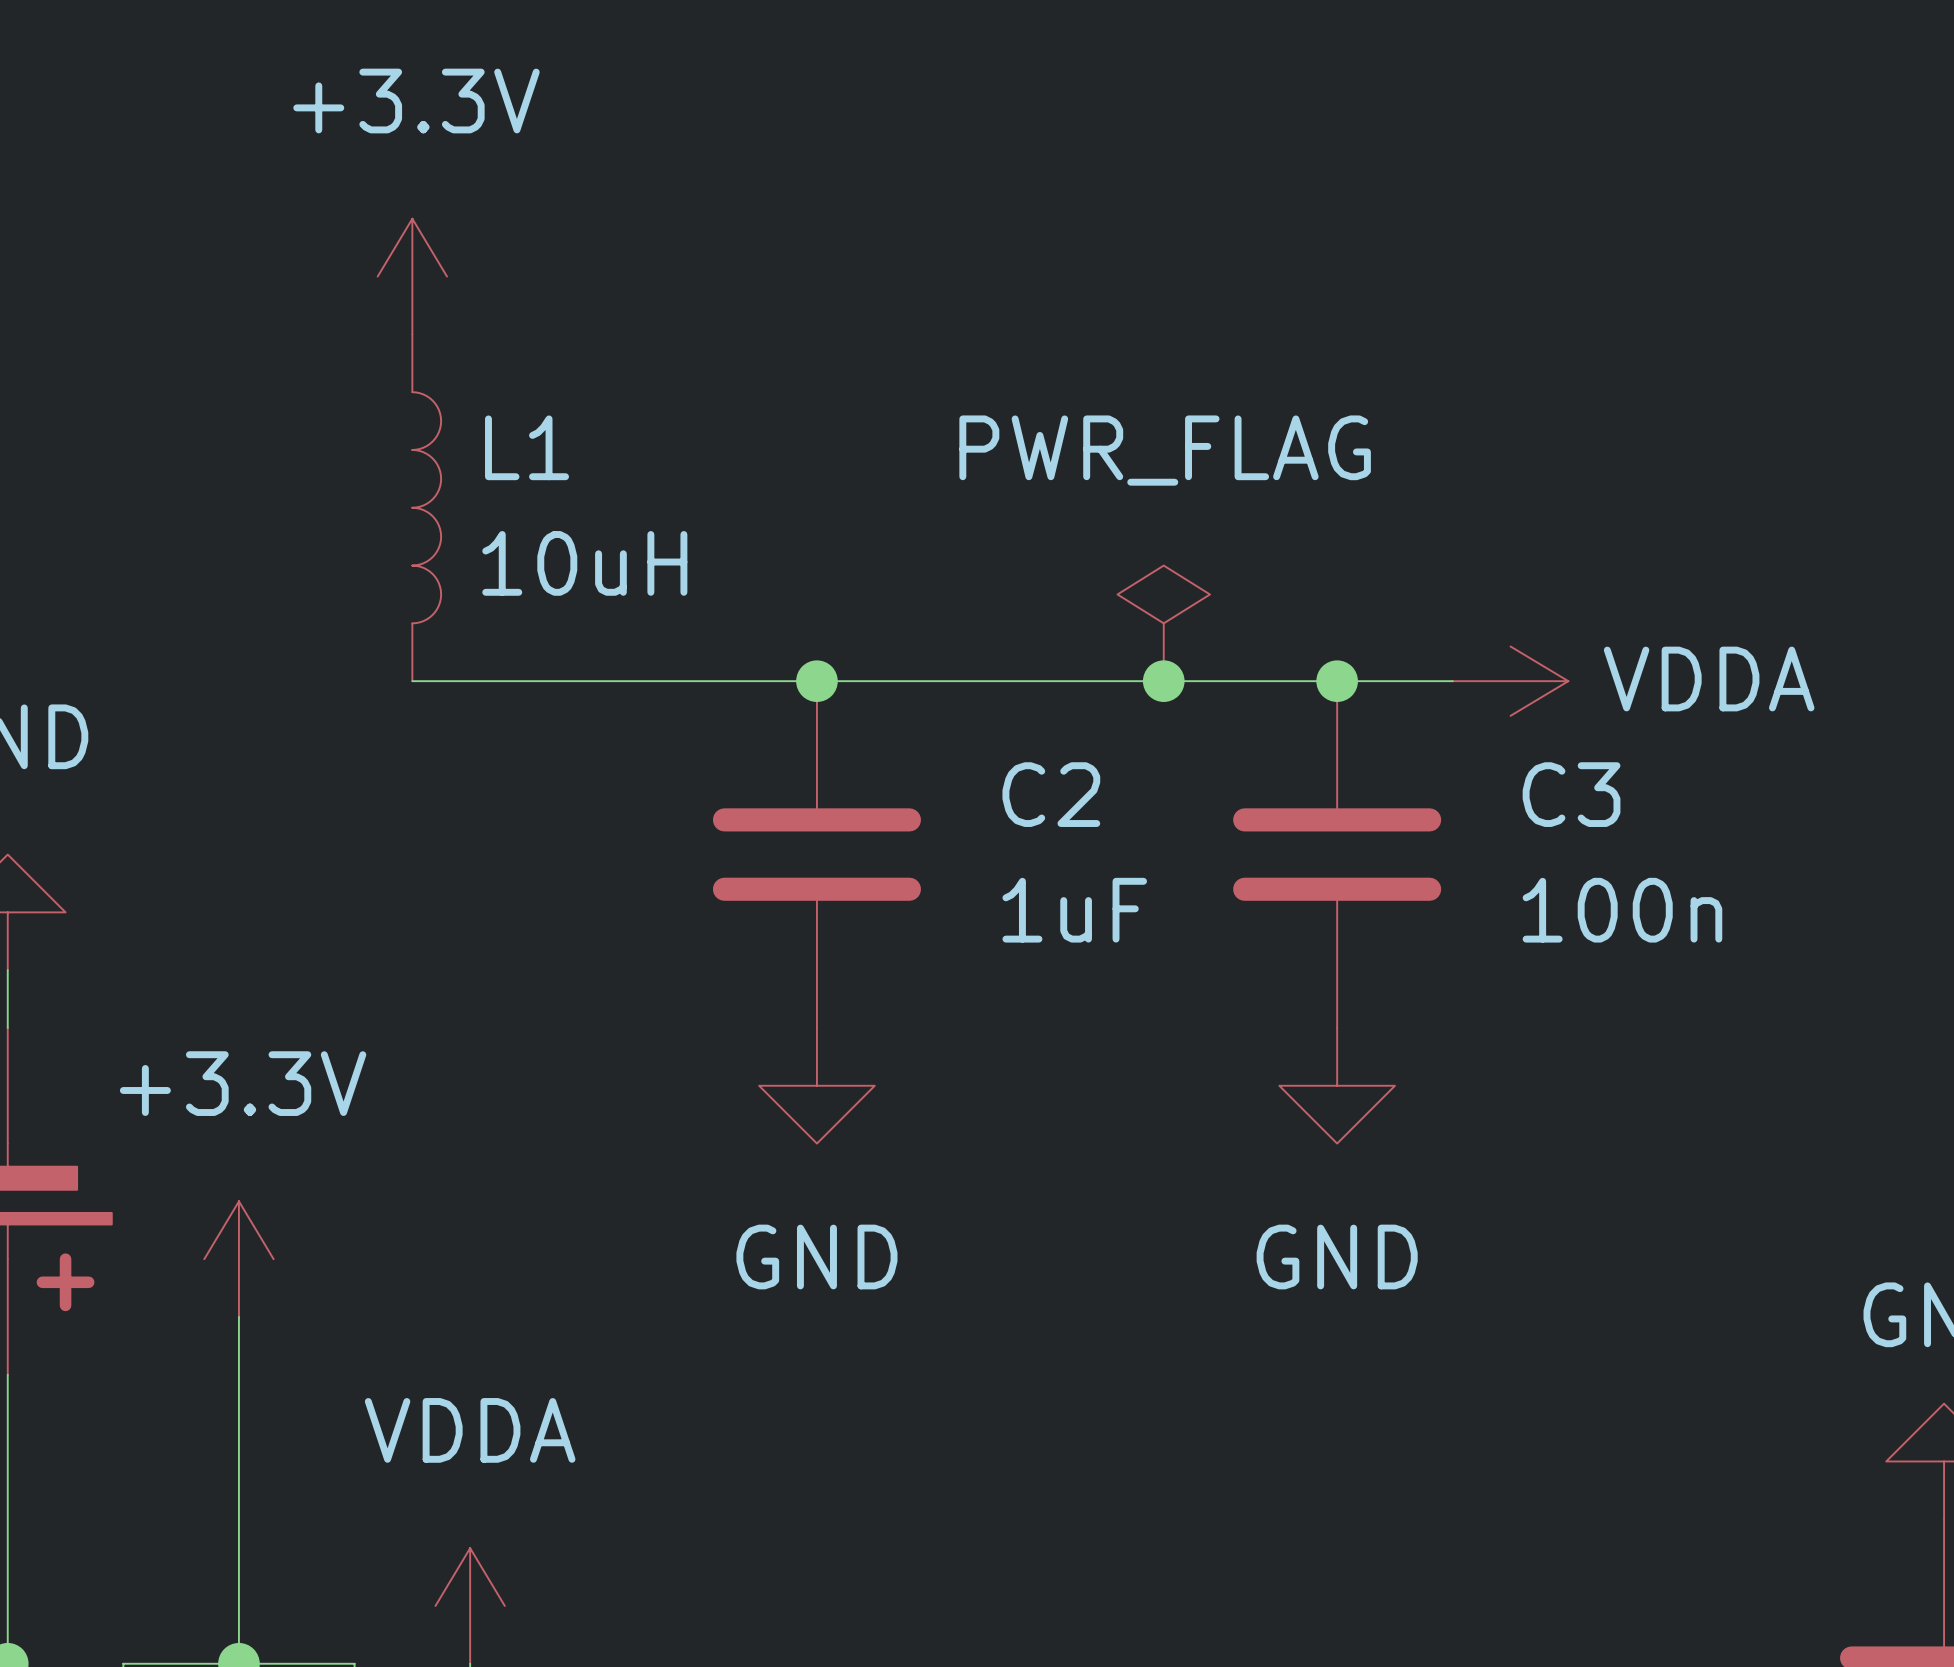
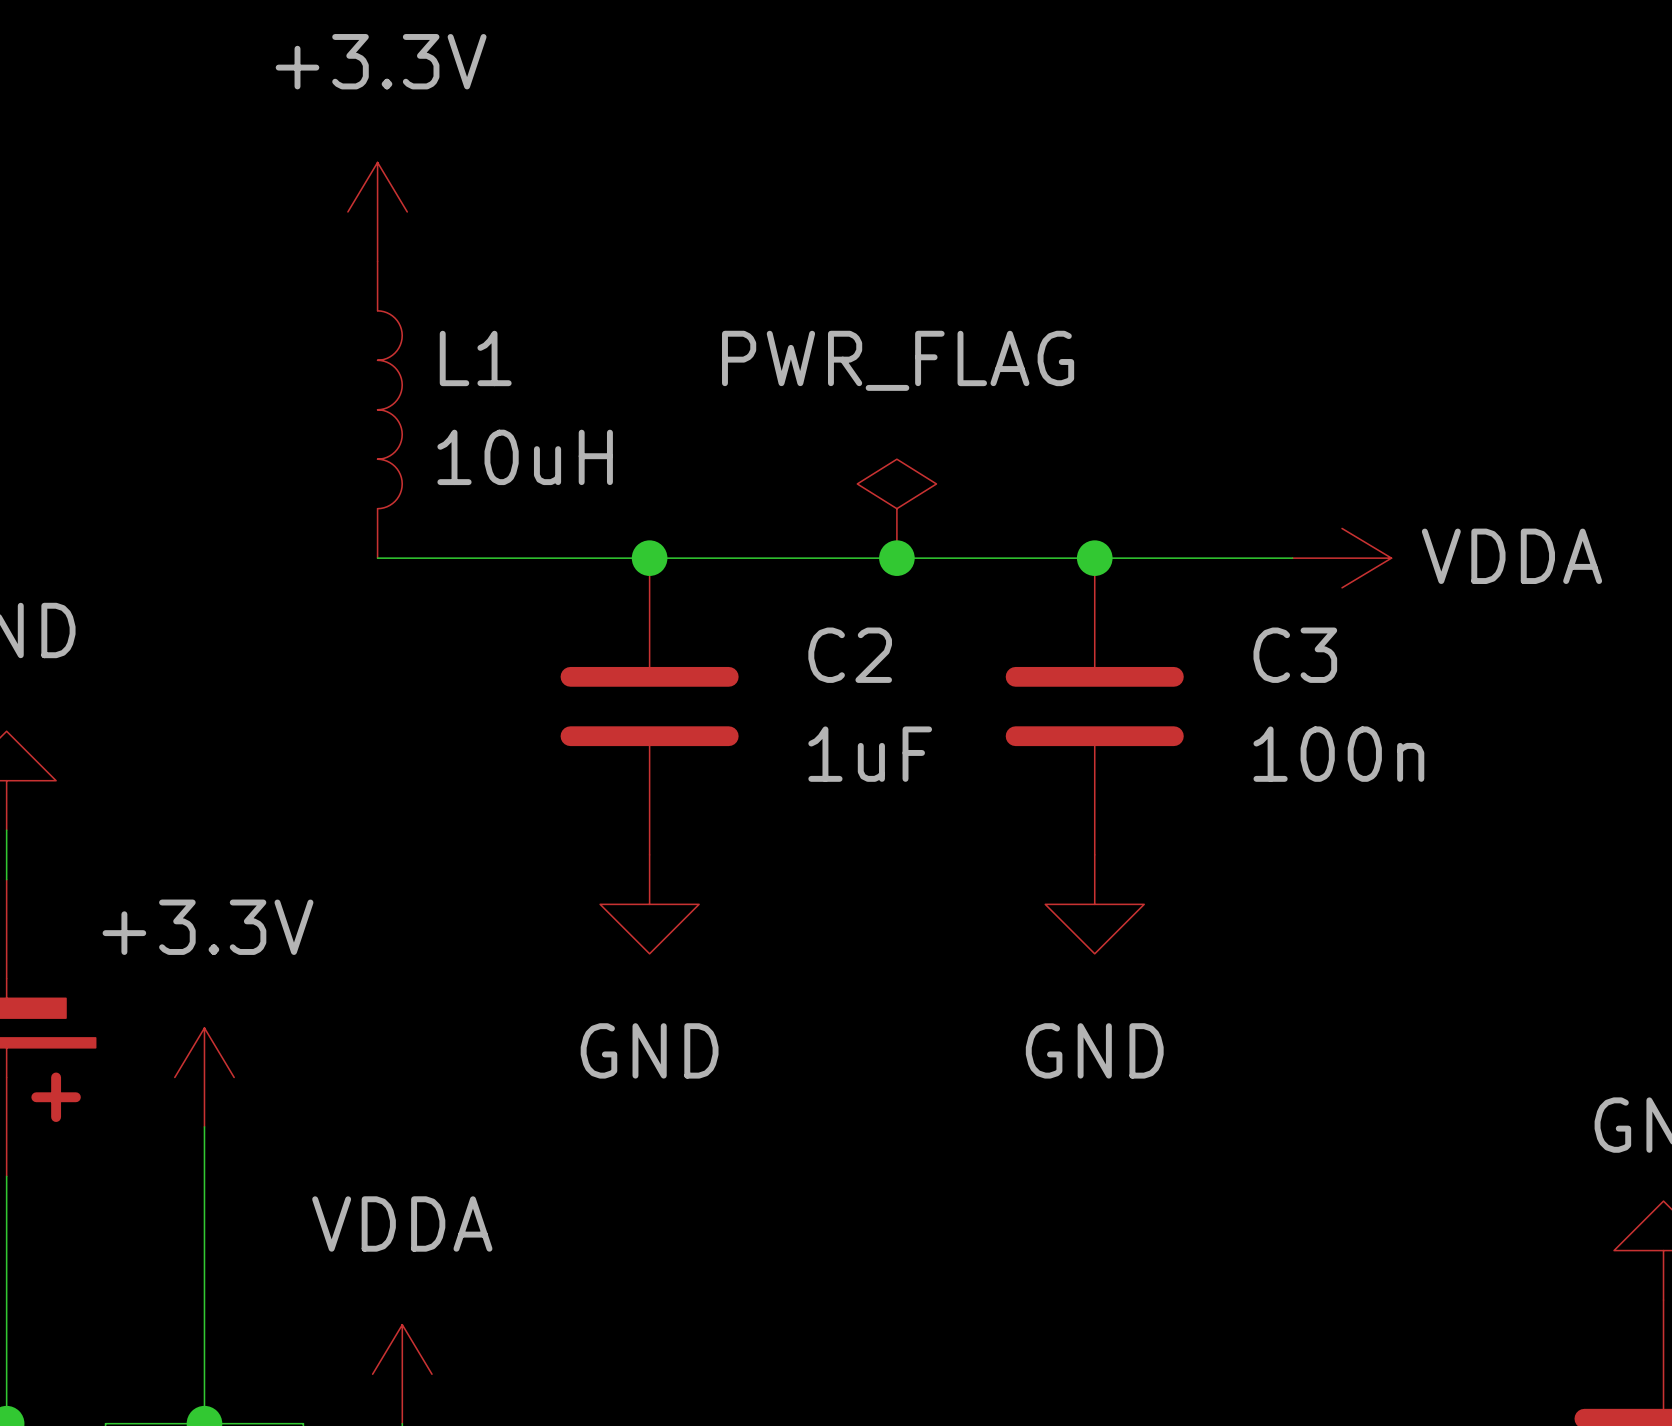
power symbol position: +3.3V (412, 276) -> +3.3V (377, 211)
L1 position: (426, 507) -> (389, 409)
power symbol position: PWR_FLAG (1163, 623) -> PWR_FLAG (896, 508)
wire: none -> (377, 558) (1292, 558)
junction: none -> (896, 558)
junction: none -> (1094, 558)
wire: (412, 681) (1452, 681) -> none
junction position: (816, 681) -> (649, 558)
junction: (1163, 681) -> none
junction: (1337, 681) -> none
power symbol position: VDDA (1510, 681) -> VDDA (1342, 558)
C2 position: (816, 854) -> (649, 706)
C3 position: (1337, 854) -> (1094, 706)
power symbol position: GND (816, 1085) -> GND (649, 904)
power symbol position: GND (1337, 1085) -> GND (1094, 904)

